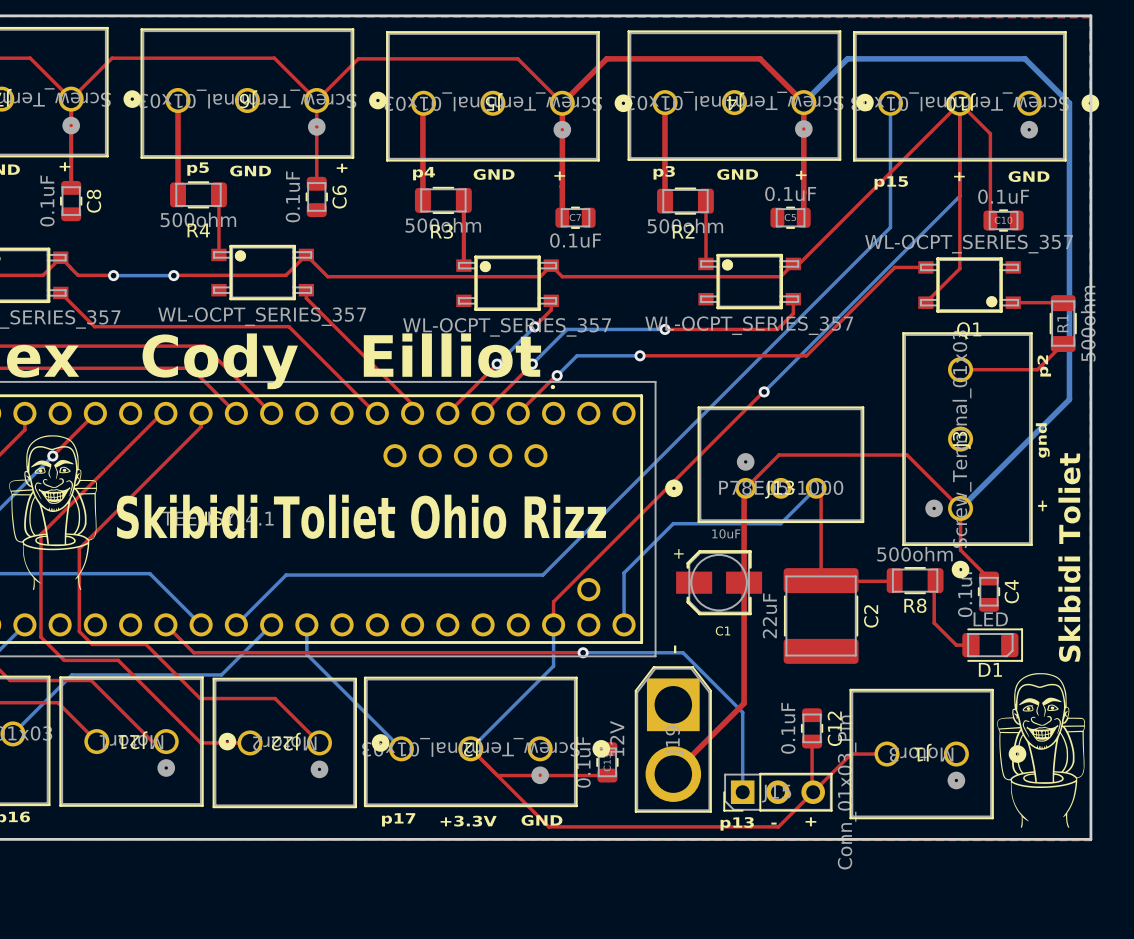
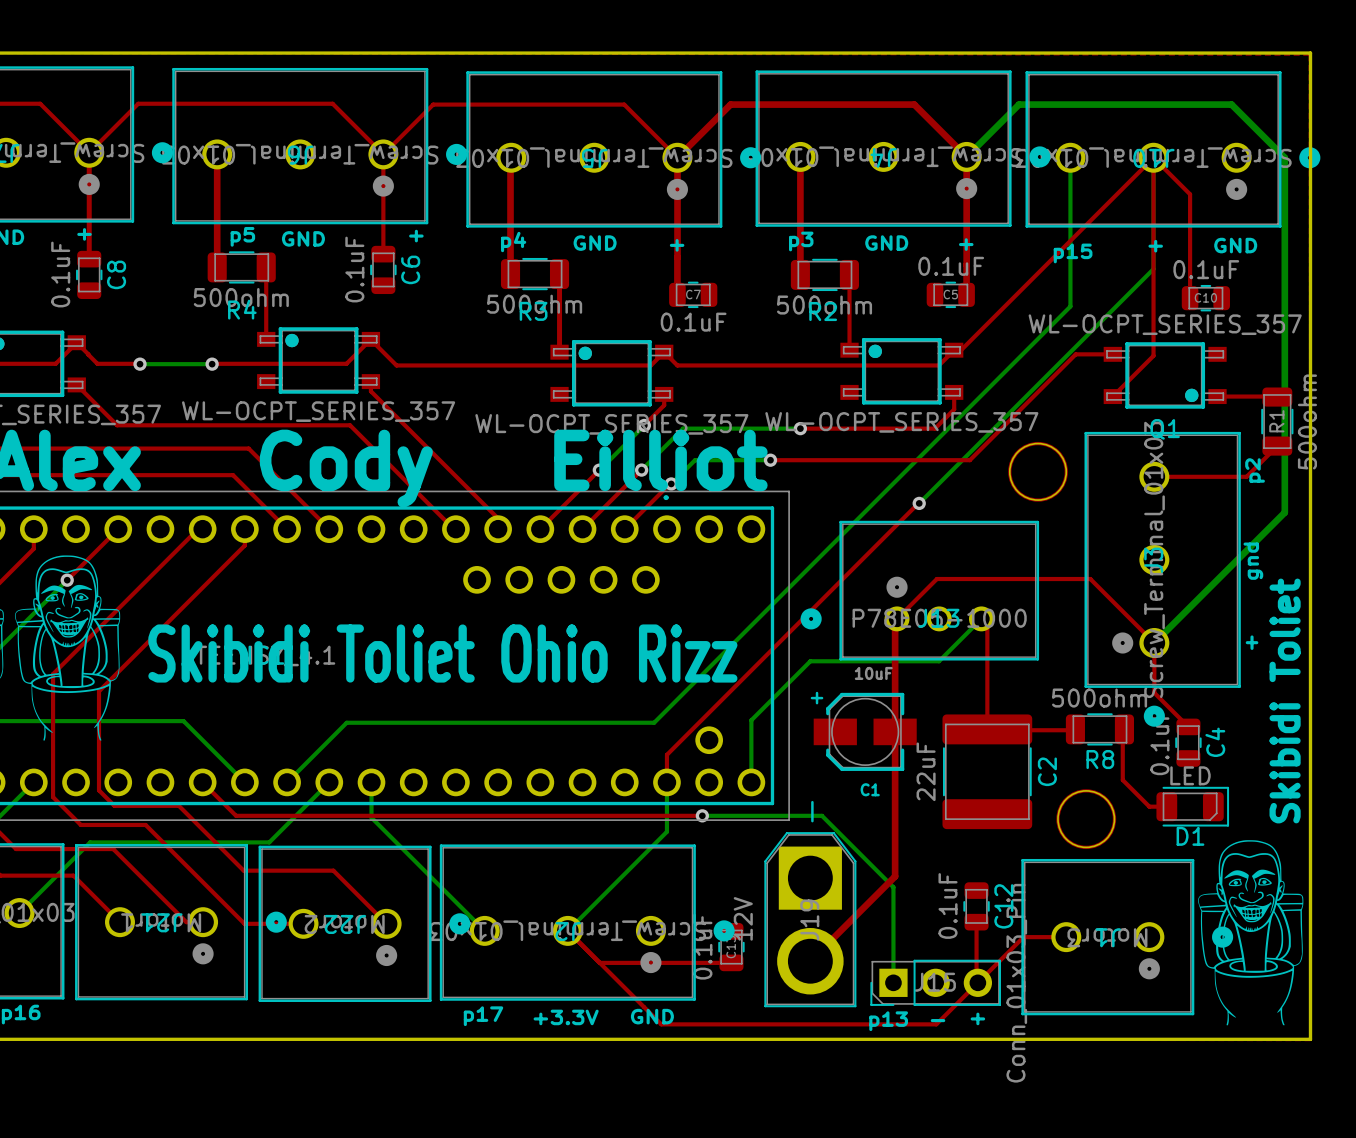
drawing: none -> [1008, 441, 1068, 502]
round board edge: none -> [1008, 442, 1068, 501]
drawing: none -> [1056, 789, 1117, 850]
round board edge: none -> [1057, 790, 1116, 849]

